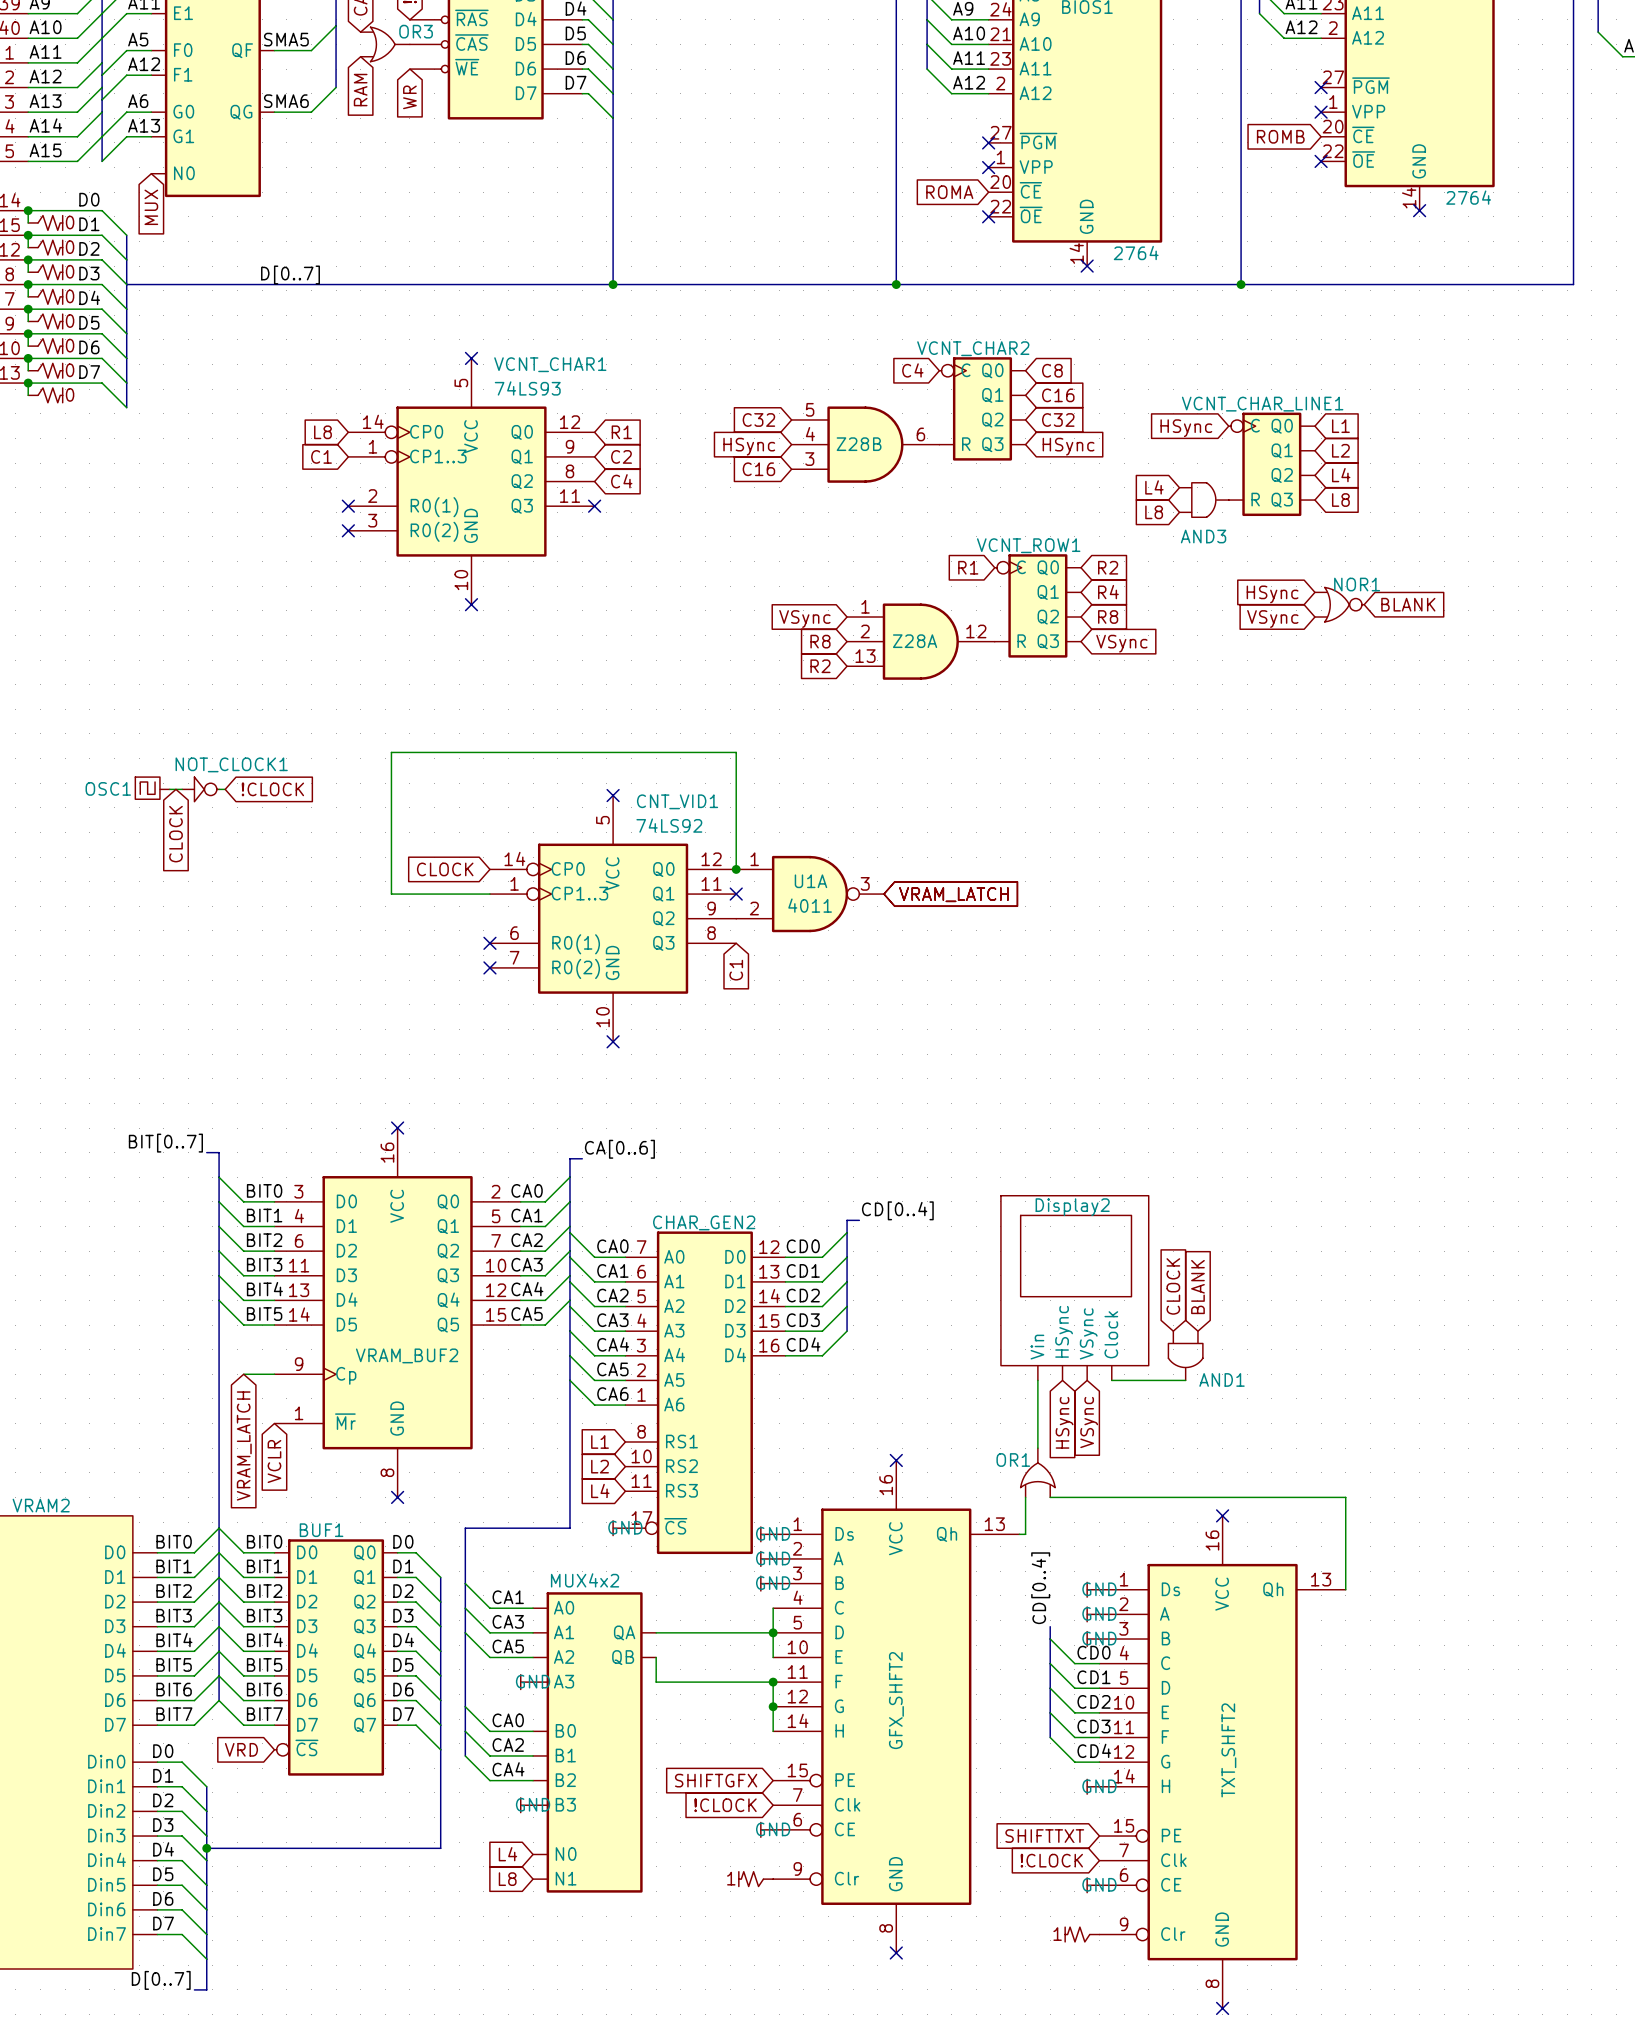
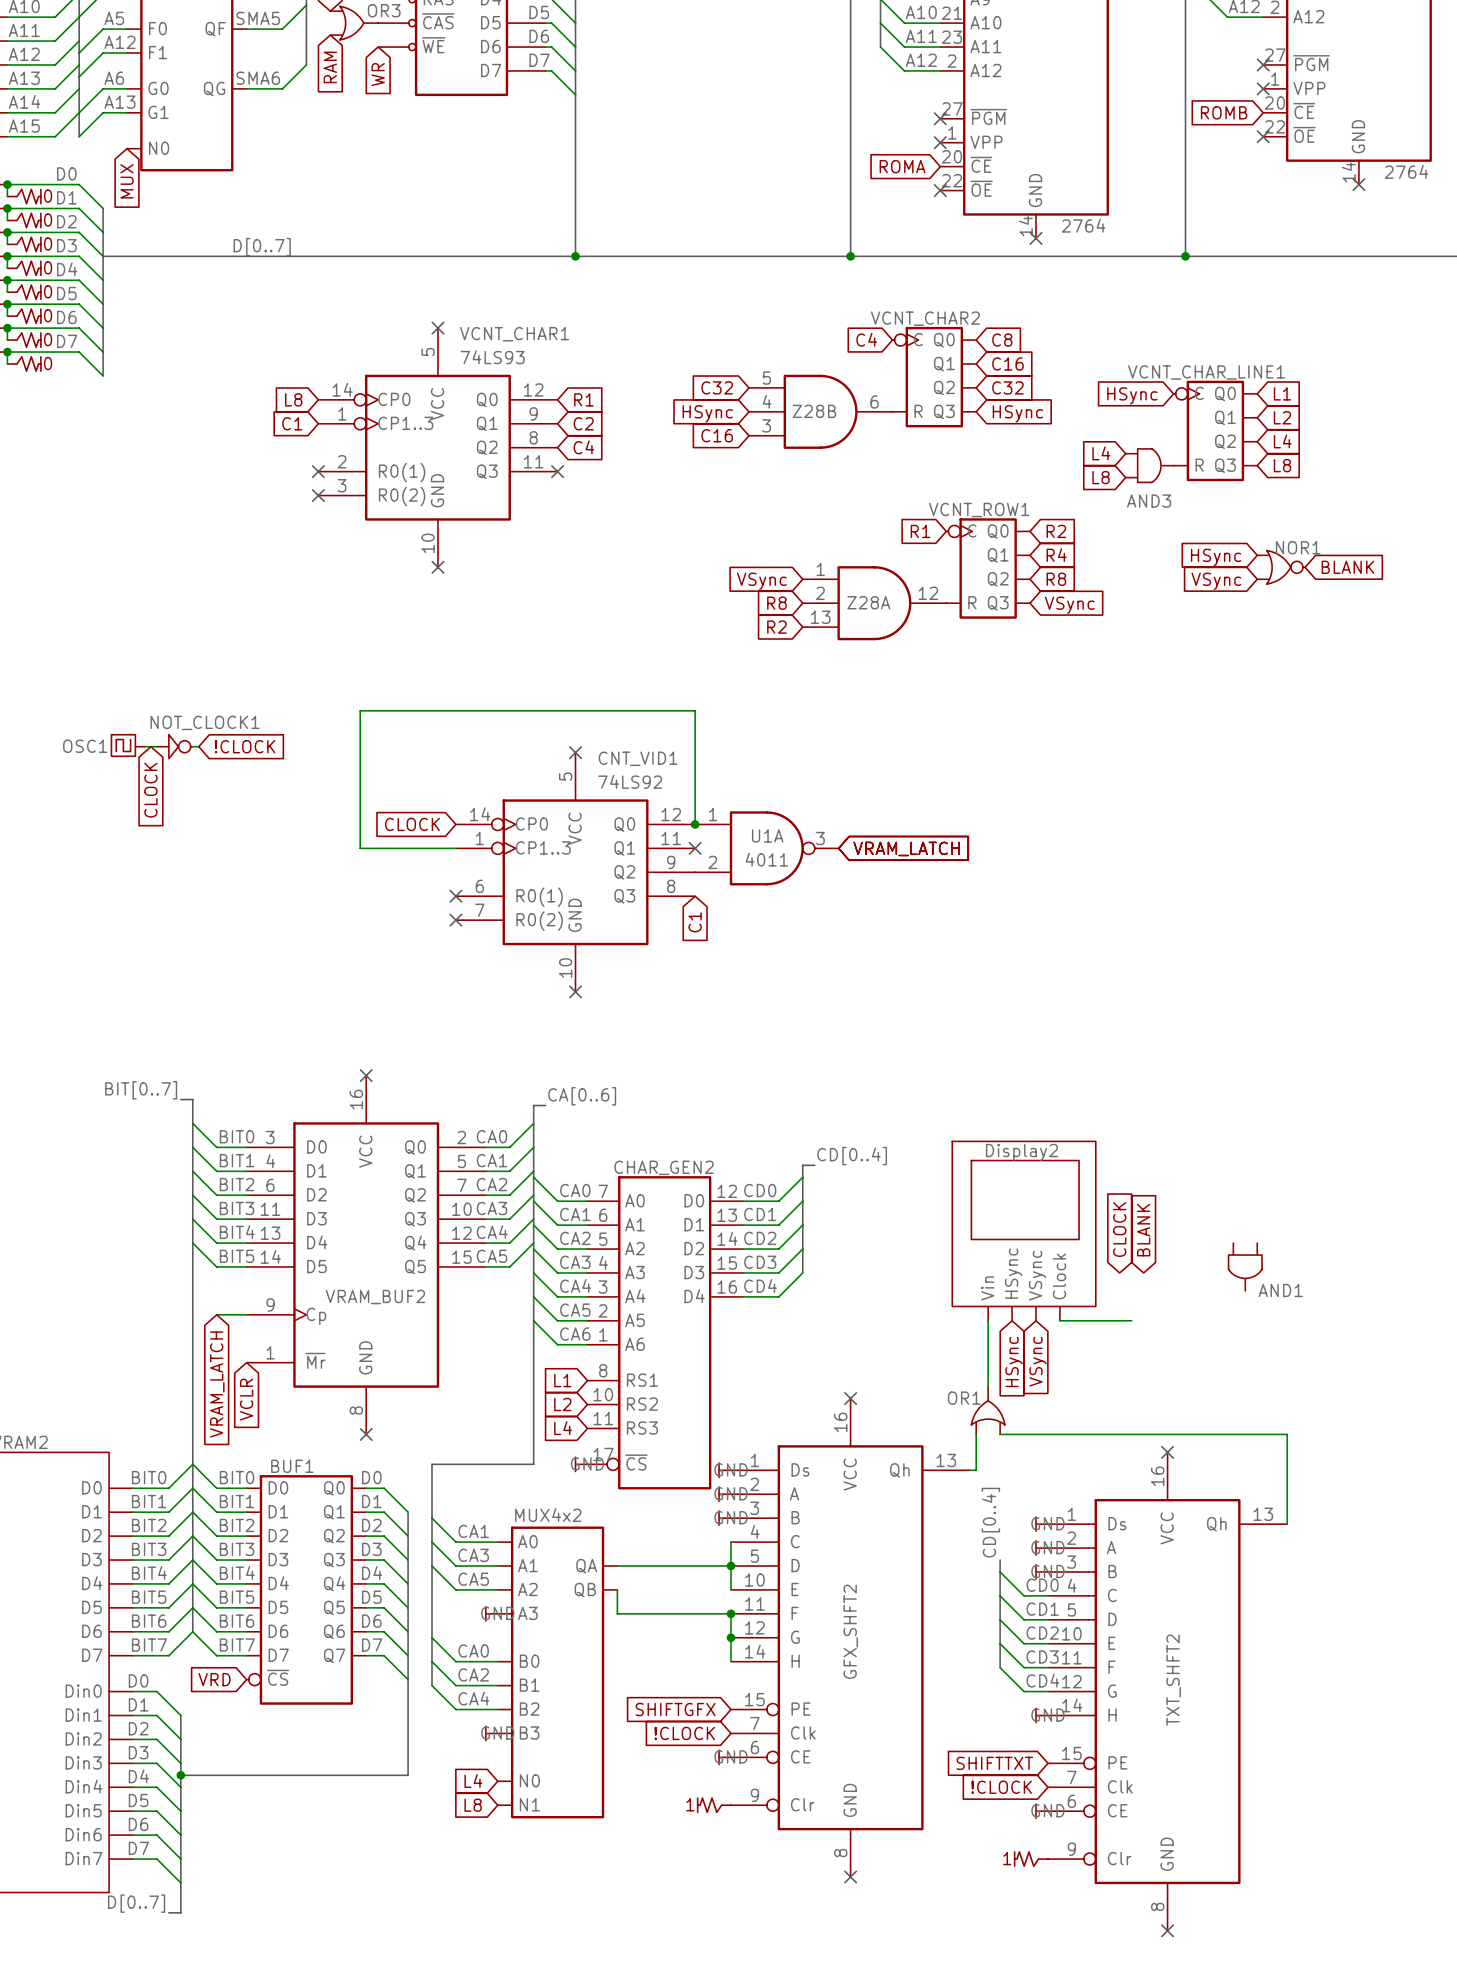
AND1 position: (1185, 1355) -> (1245, 1266)

